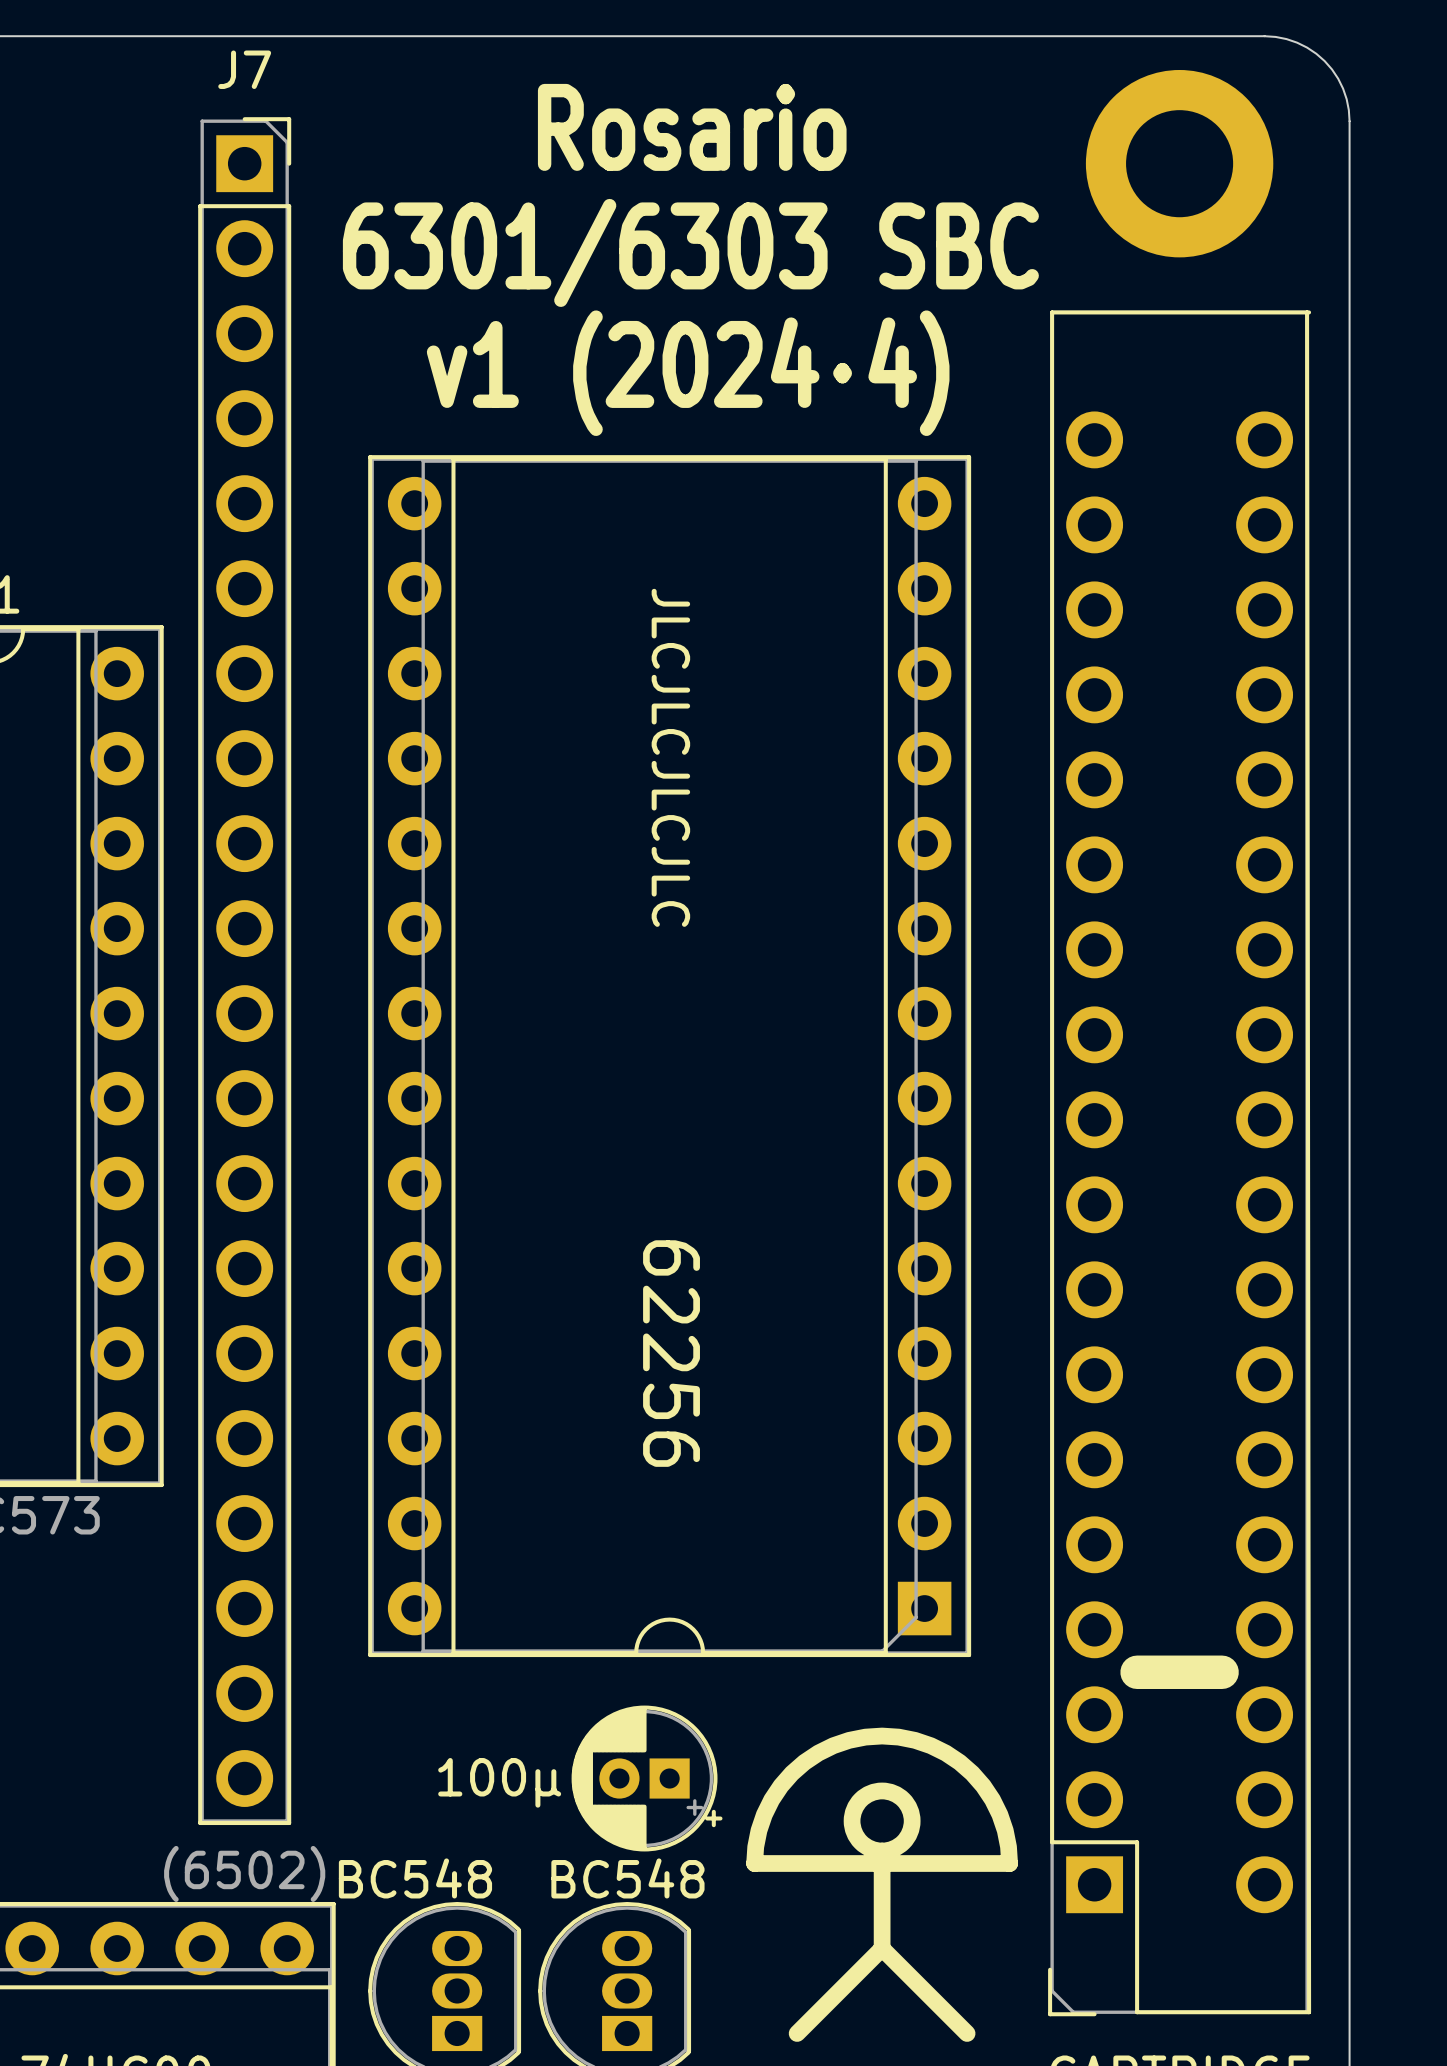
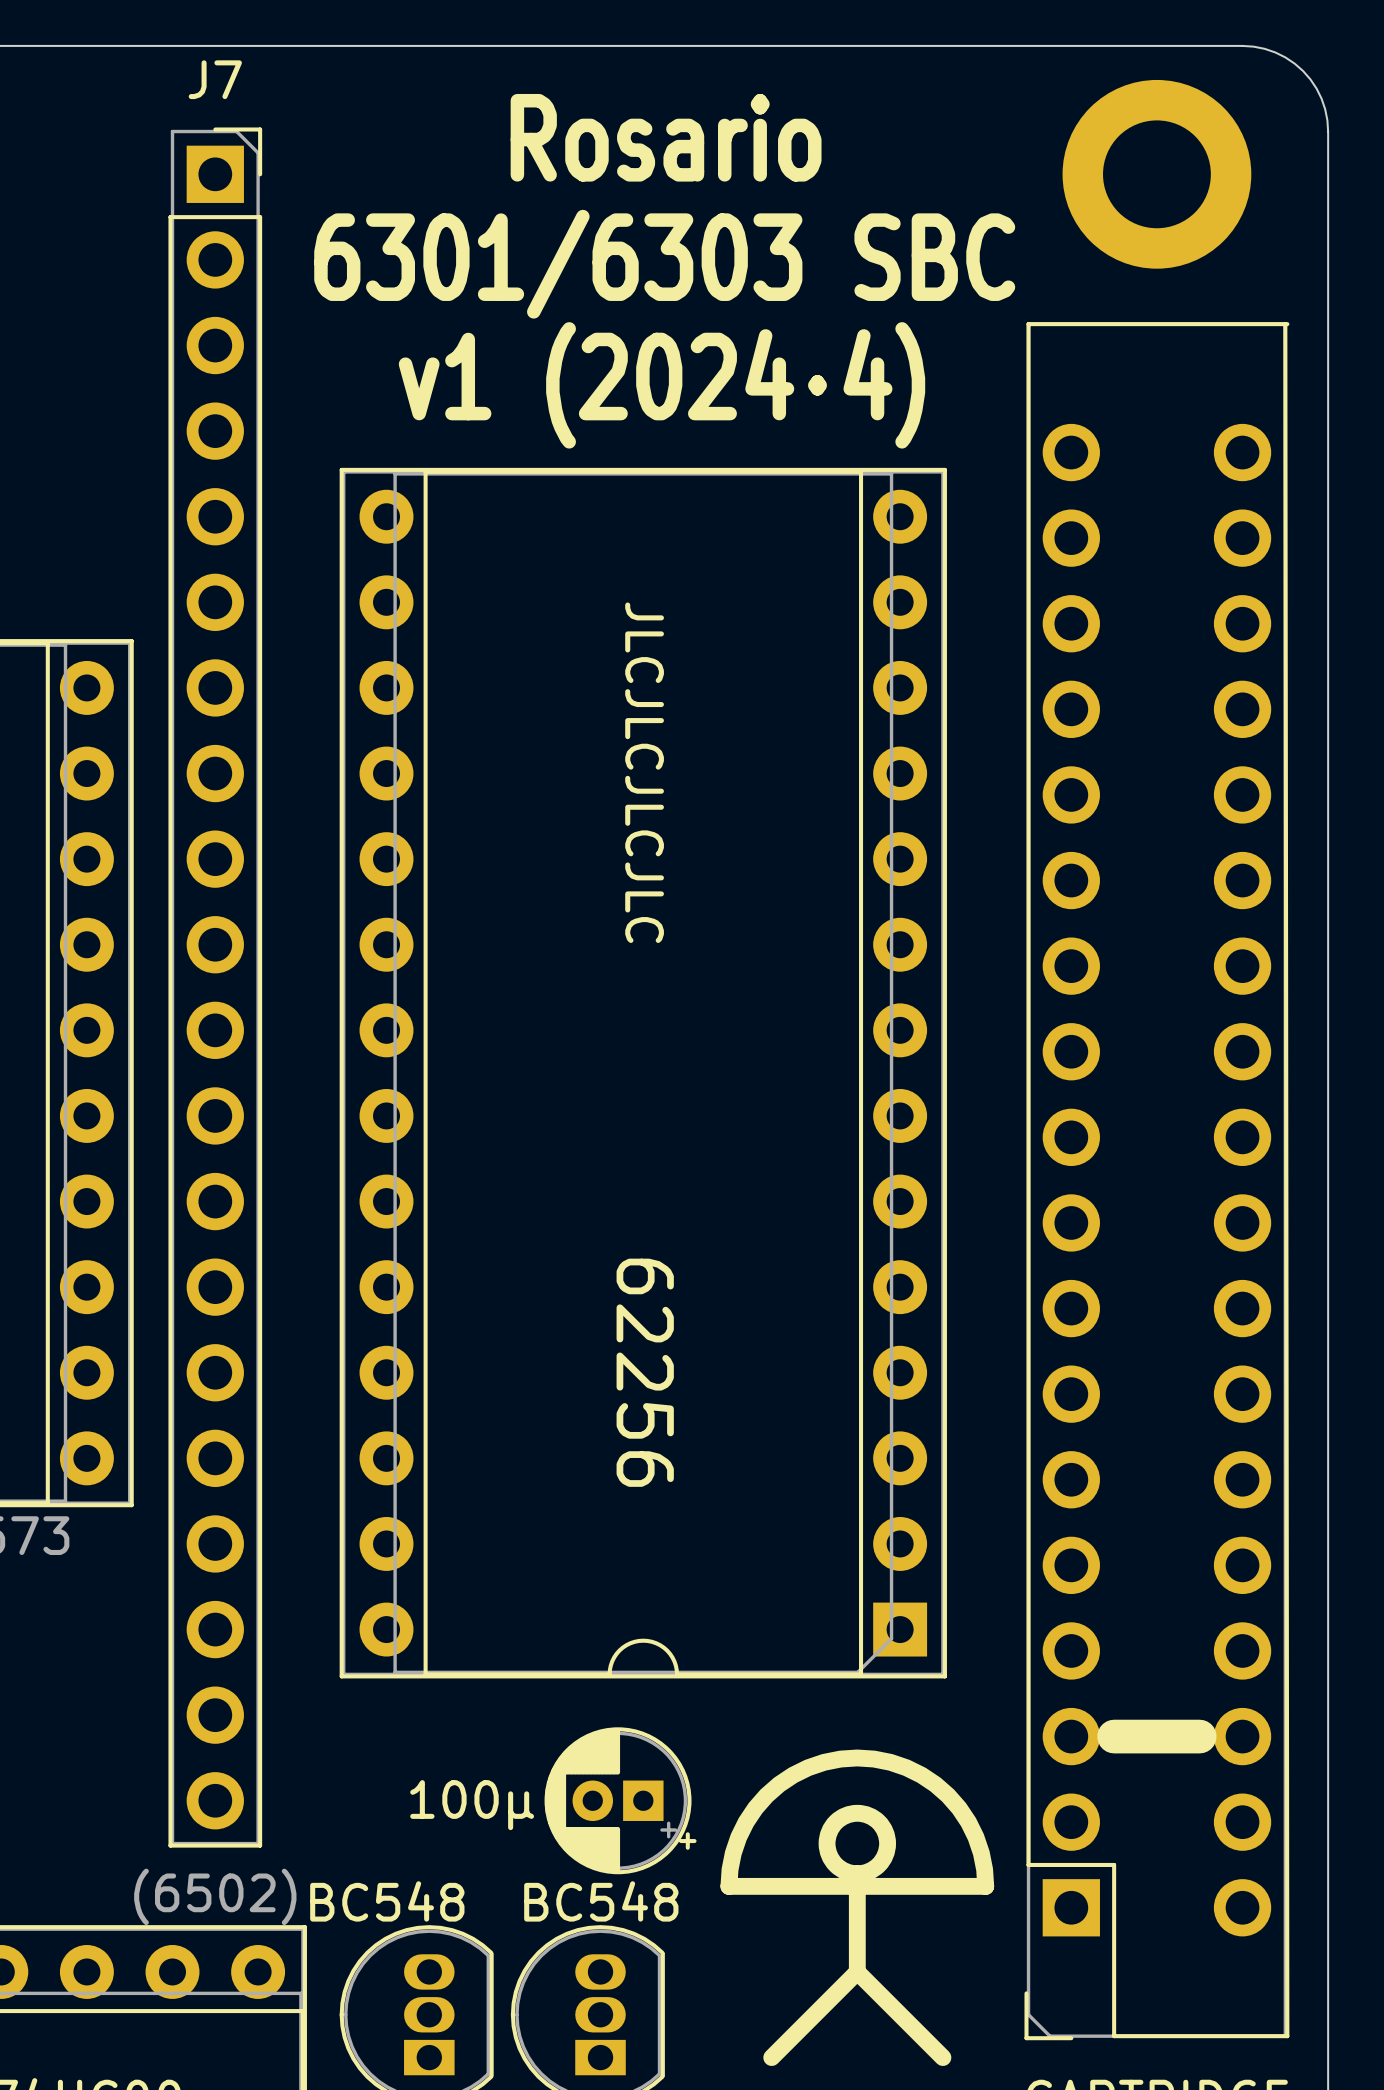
line: (1137, 1672) (1222, 1672) -> (1114, 1736) (1199, 1736)

